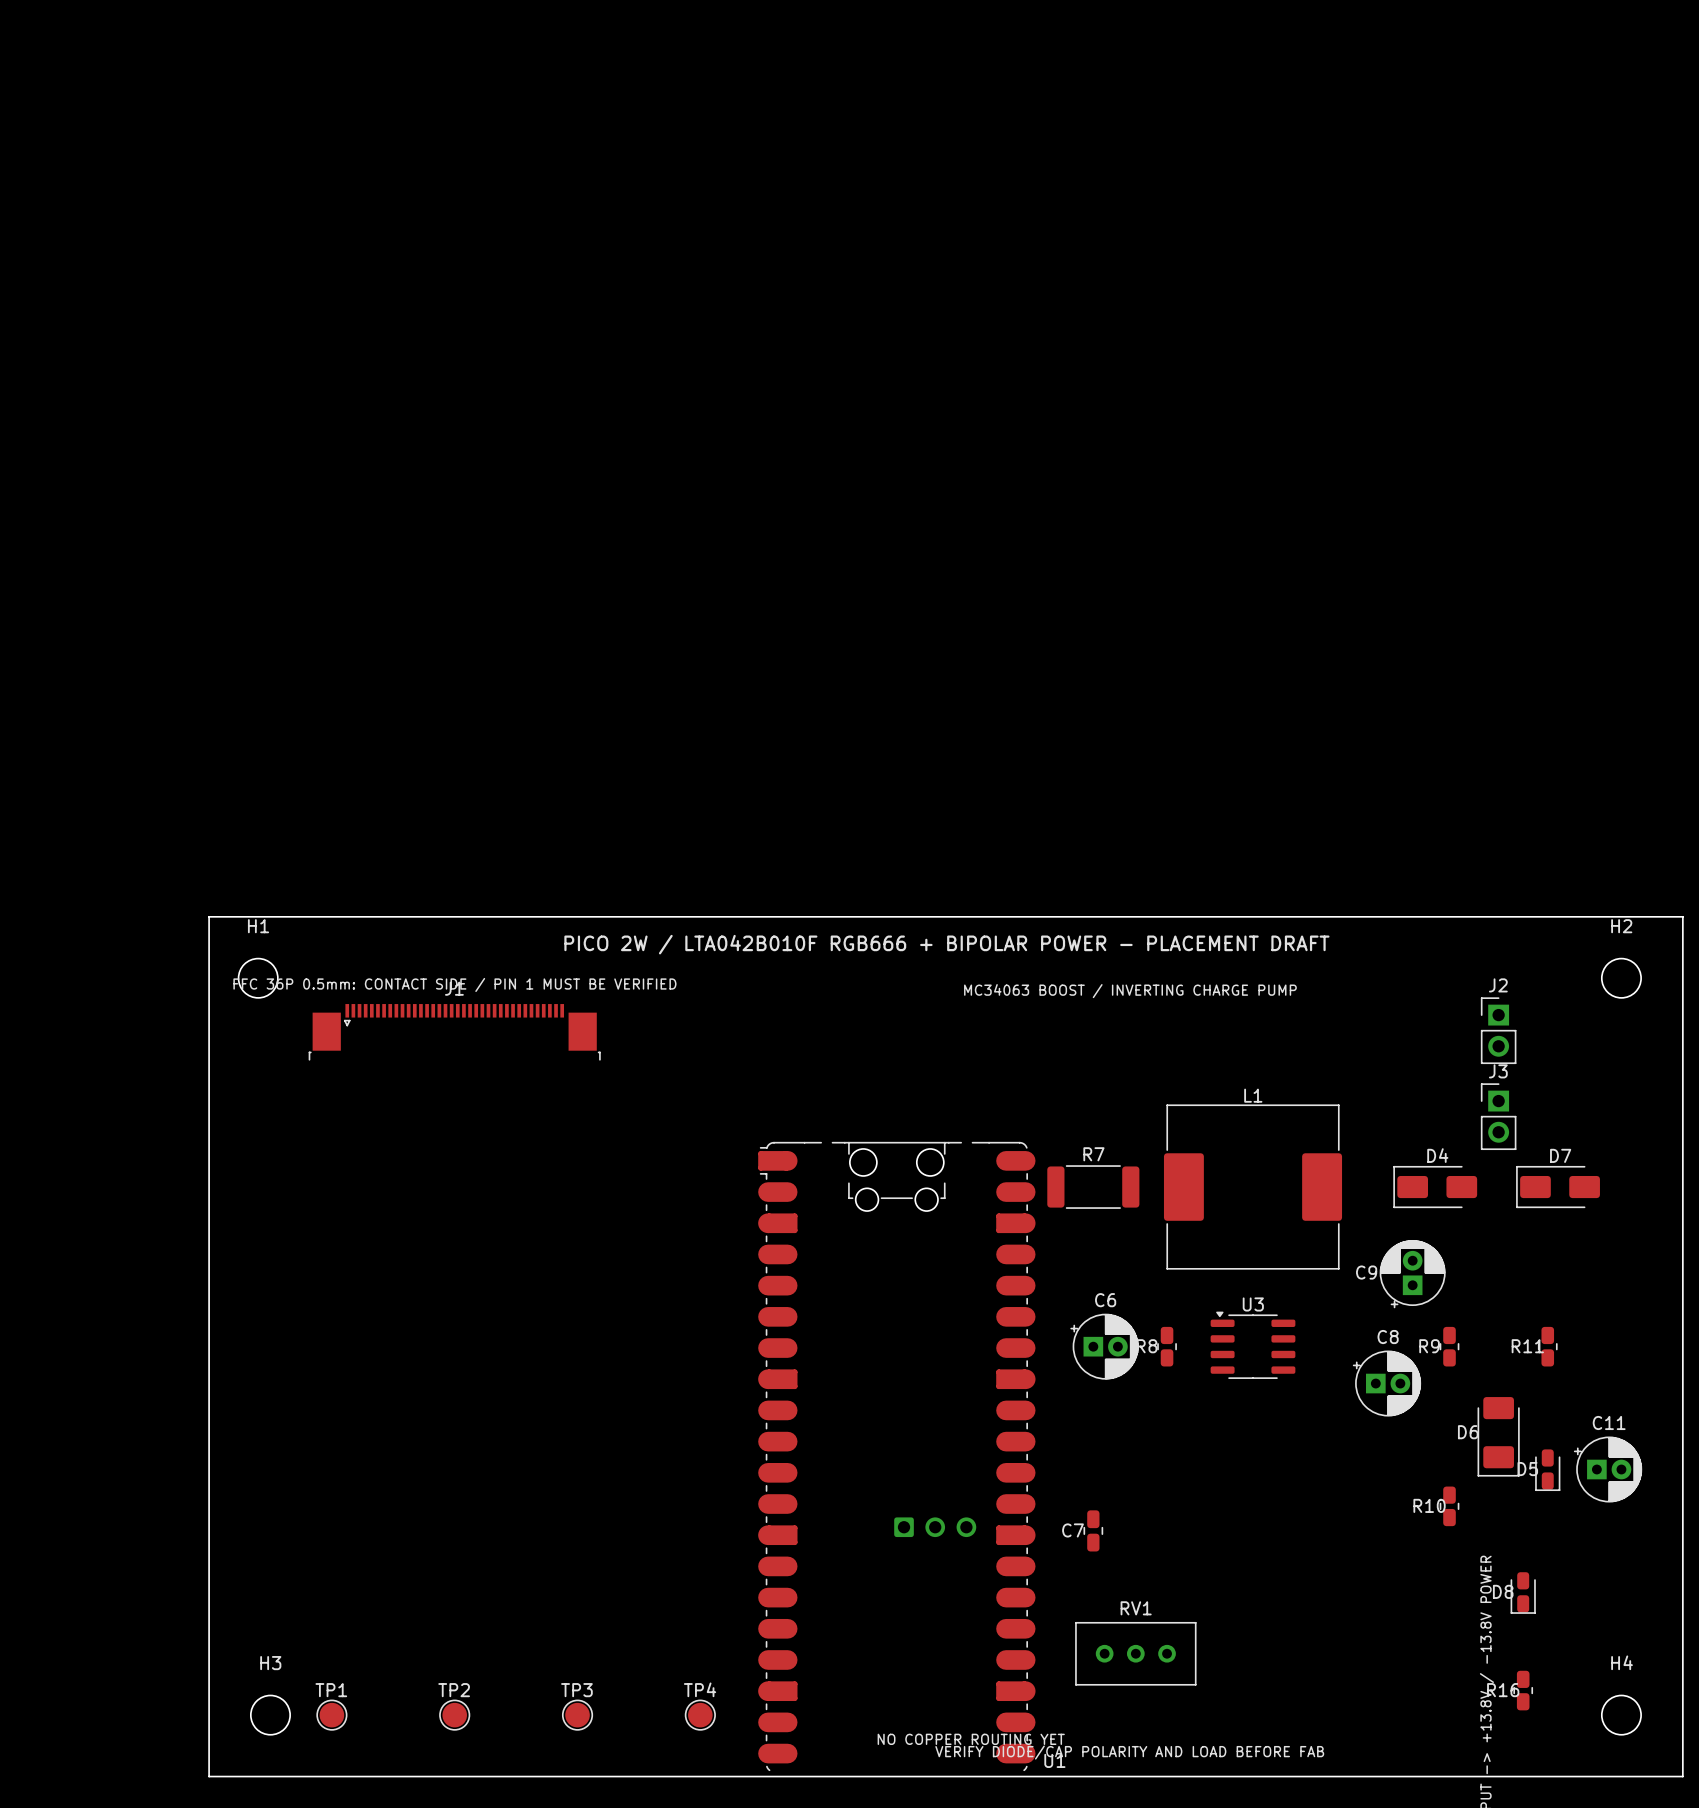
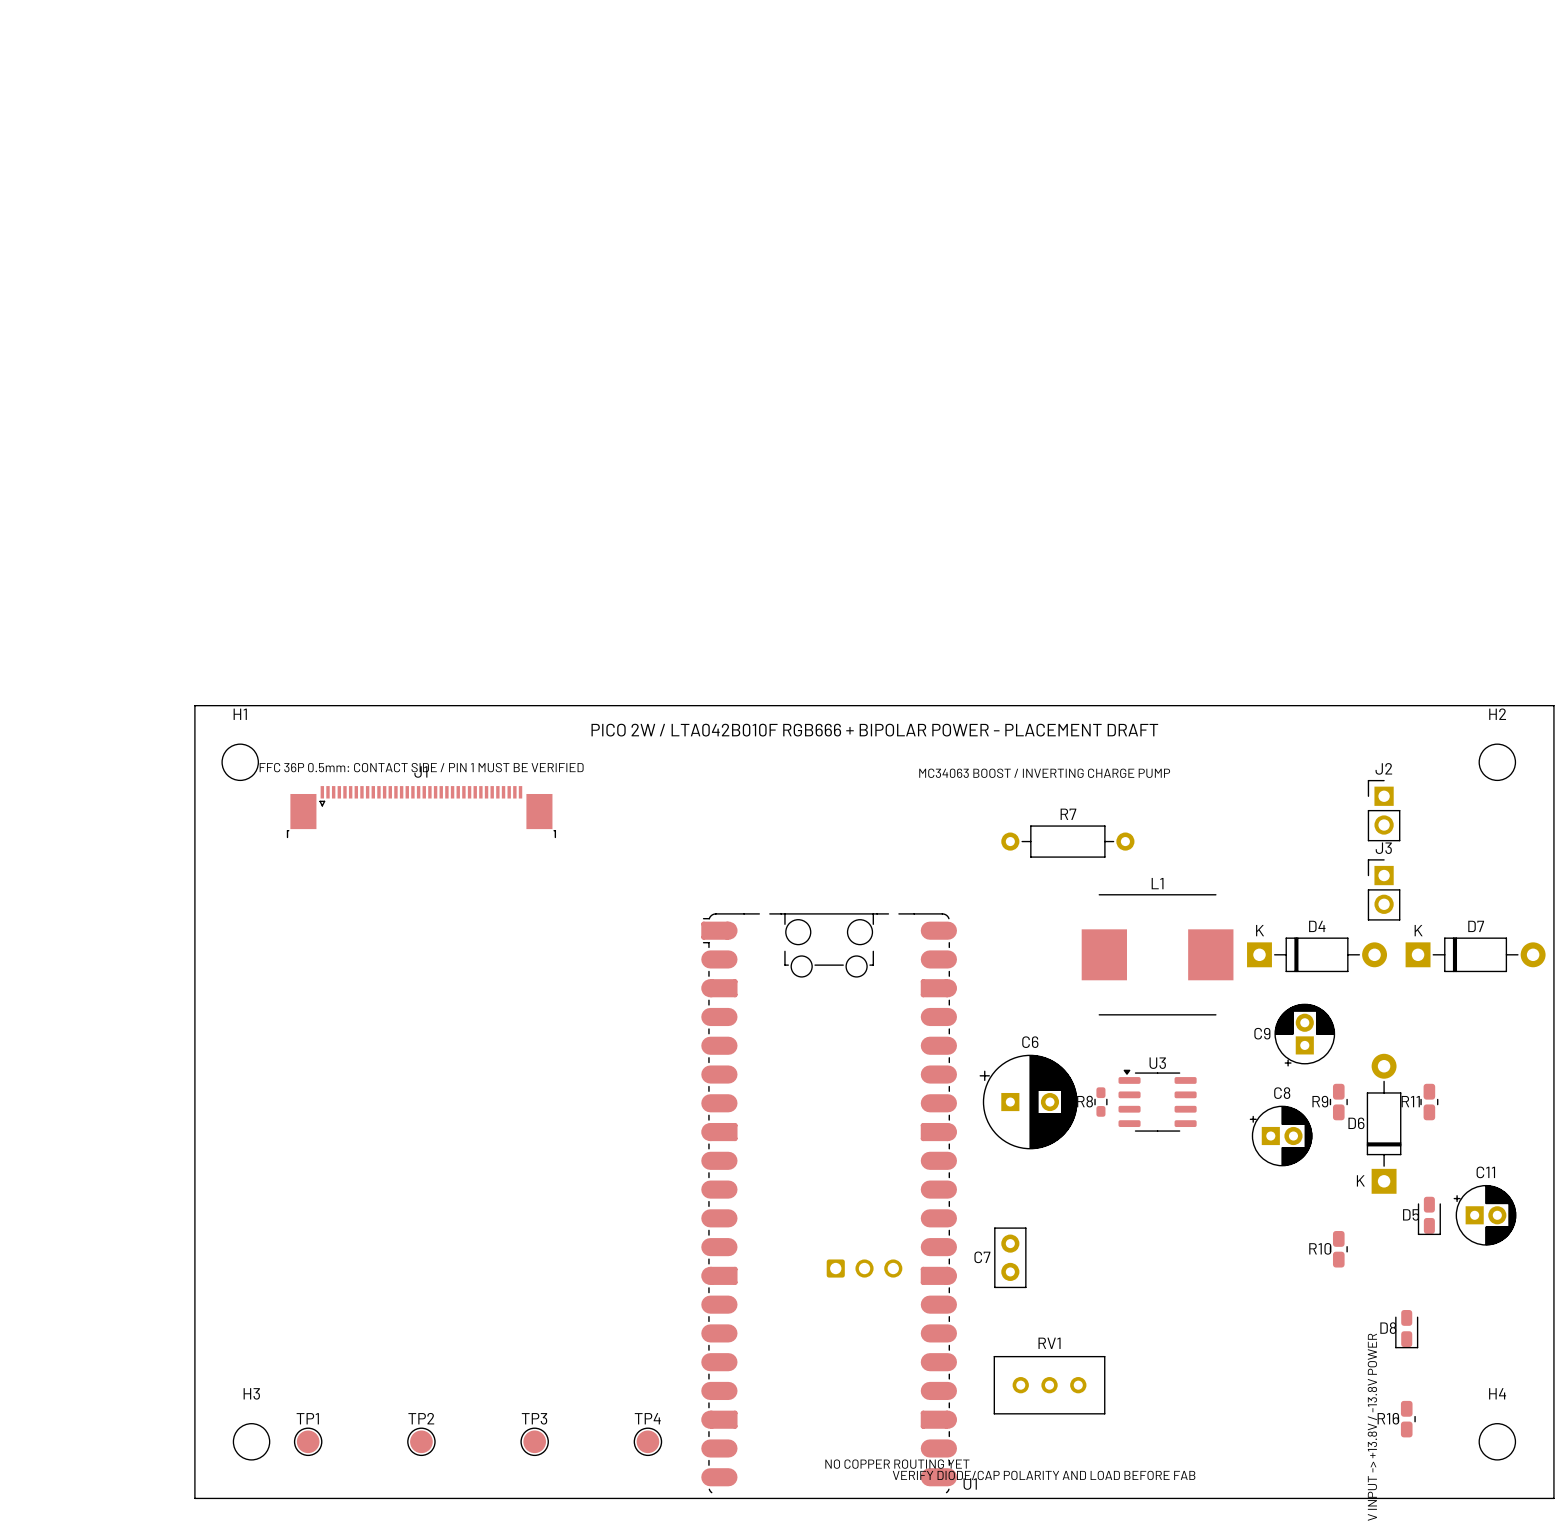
L1 footprint: [1163, 1104, 1343, 1270] -> [1081, 894, 1234, 1016]
R7 footprint: [1047, 1165, 1140, 1209] -> [1001, 825, 1135, 858]
D4 footprint: [1393, 1166, 1478, 1209] -> [1247, 937, 1388, 973]
D7 footprint: [1516, 1166, 1600, 1209] -> [1405, 937, 1546, 973]
C6 footprint: [1070, 1313, 1139, 1380] -> [979, 1054, 1078, 1150]
R8 footprint: [1157, 1326, 1177, 1367] -> [1094, 1087, 1108, 1117]
D6 footprint: [1477, 1397, 1520, 1477] -> [1366, 1053, 1402, 1194]
C7 footprint: [1083, 1510, 1104, 1552] -> [994, 1227, 1027, 1289]

